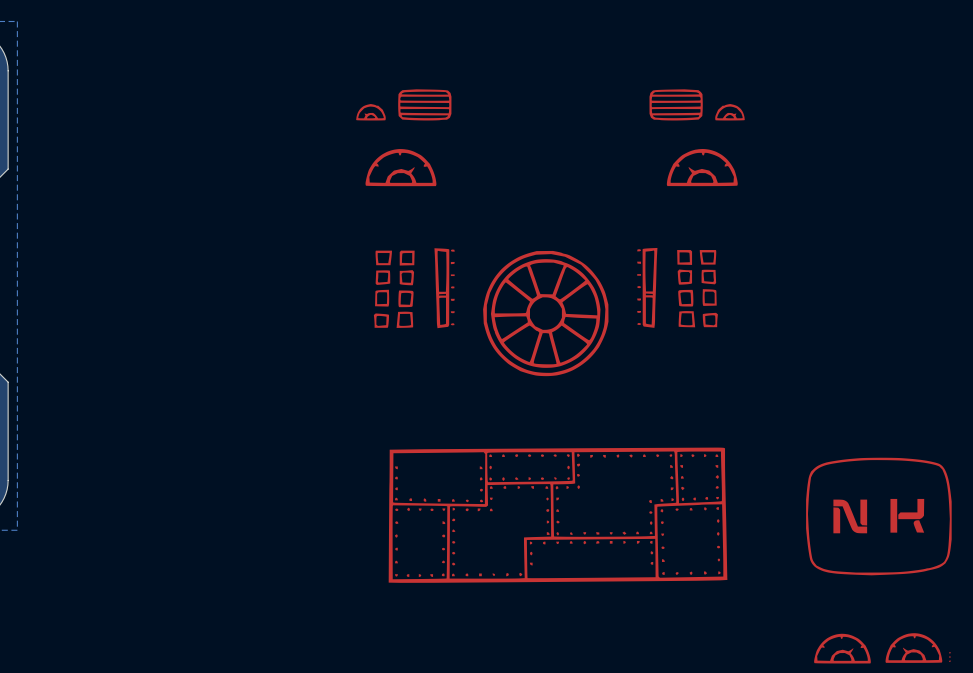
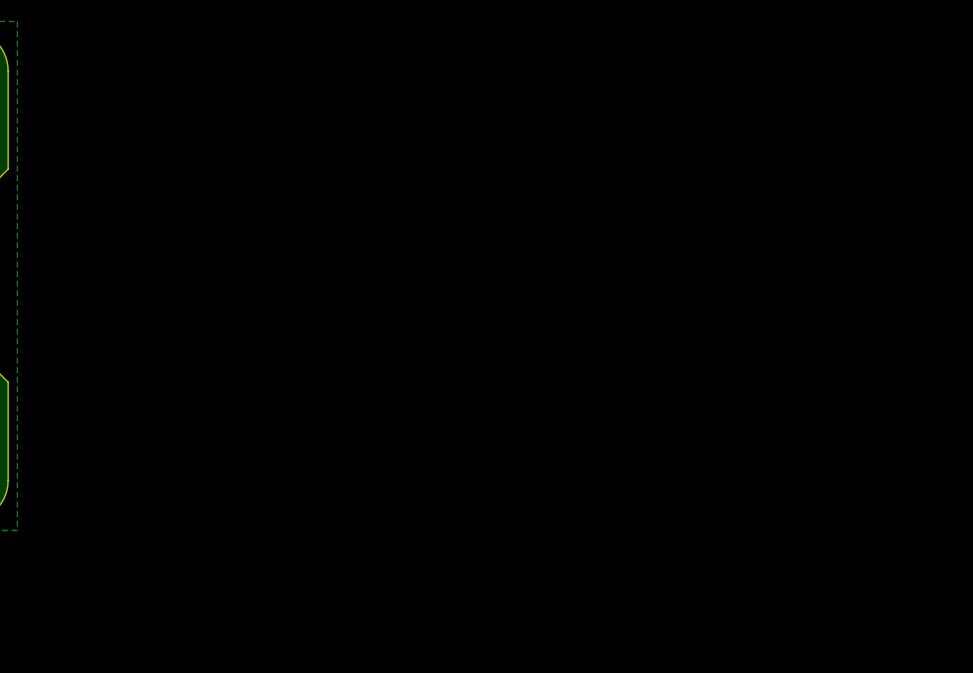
drawing: [398, 89, 452, 121] -> none
drawing: [649, 89, 703, 121] -> none
drawing: [356, 104, 386, 121] -> none
drawing: [715, 104, 745, 121] -> none
drawing: [365, 149, 437, 187] -> none
drawing: [666, 149, 738, 187] -> none
drawing: [637, 247, 658, 328] -> none
drawing: [434, 248, 455, 329] -> none
drawing: [373, 250, 415, 328] -> none
drawing: [483, 250, 609, 377] -> none
drawing: [677, 250, 718, 328] -> none
drawing: [388, 447, 728, 583] -> none
drawing: [806, 457, 952, 576] -> none
drawing: [814, 633, 871, 664] -> none
drawing: [885, 633, 951, 663] -> none

